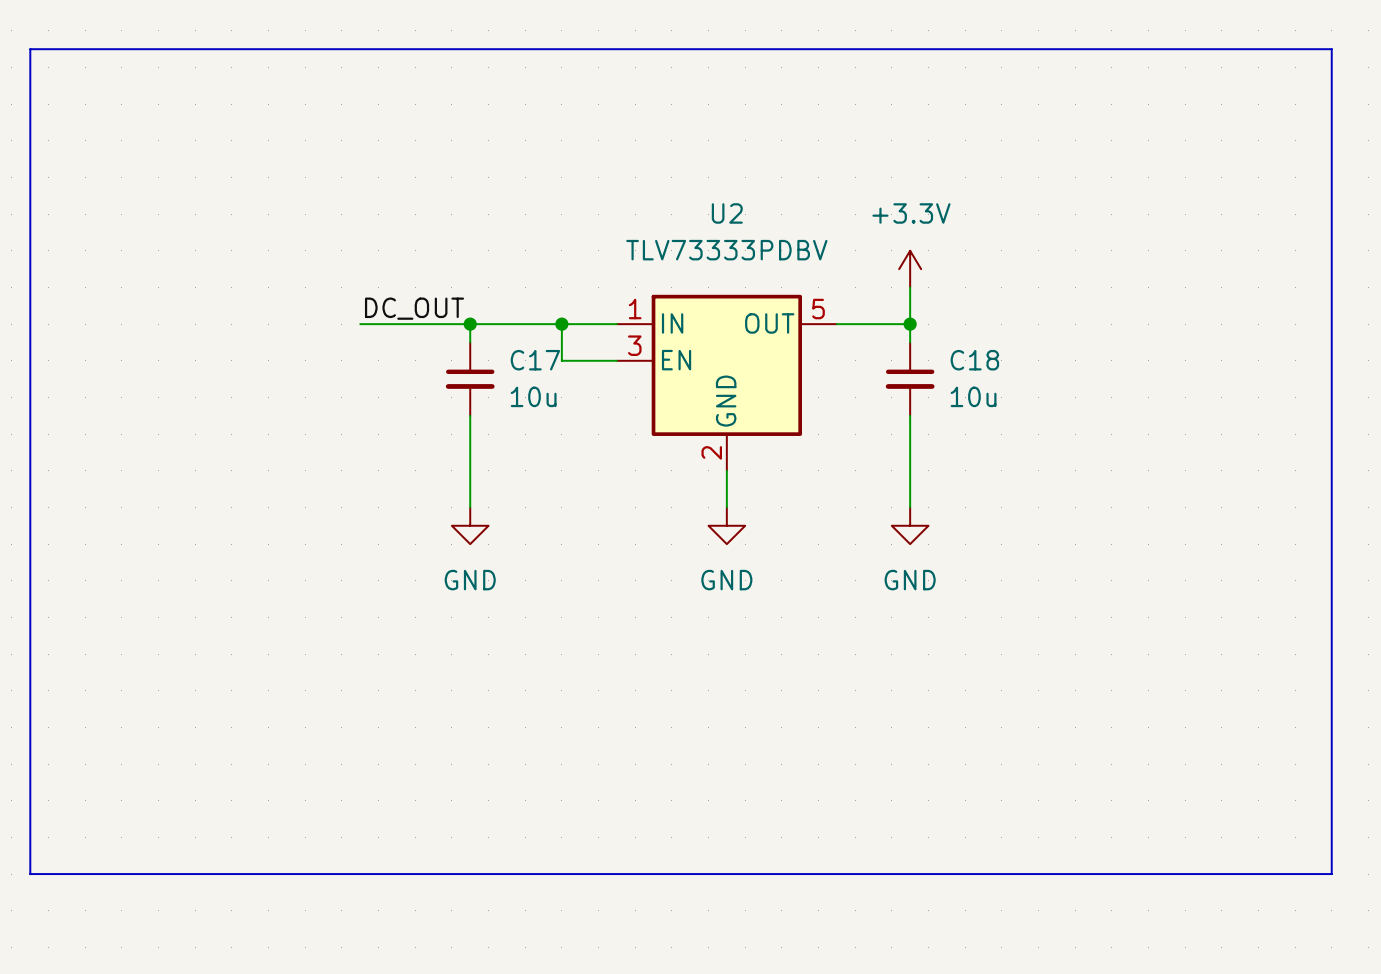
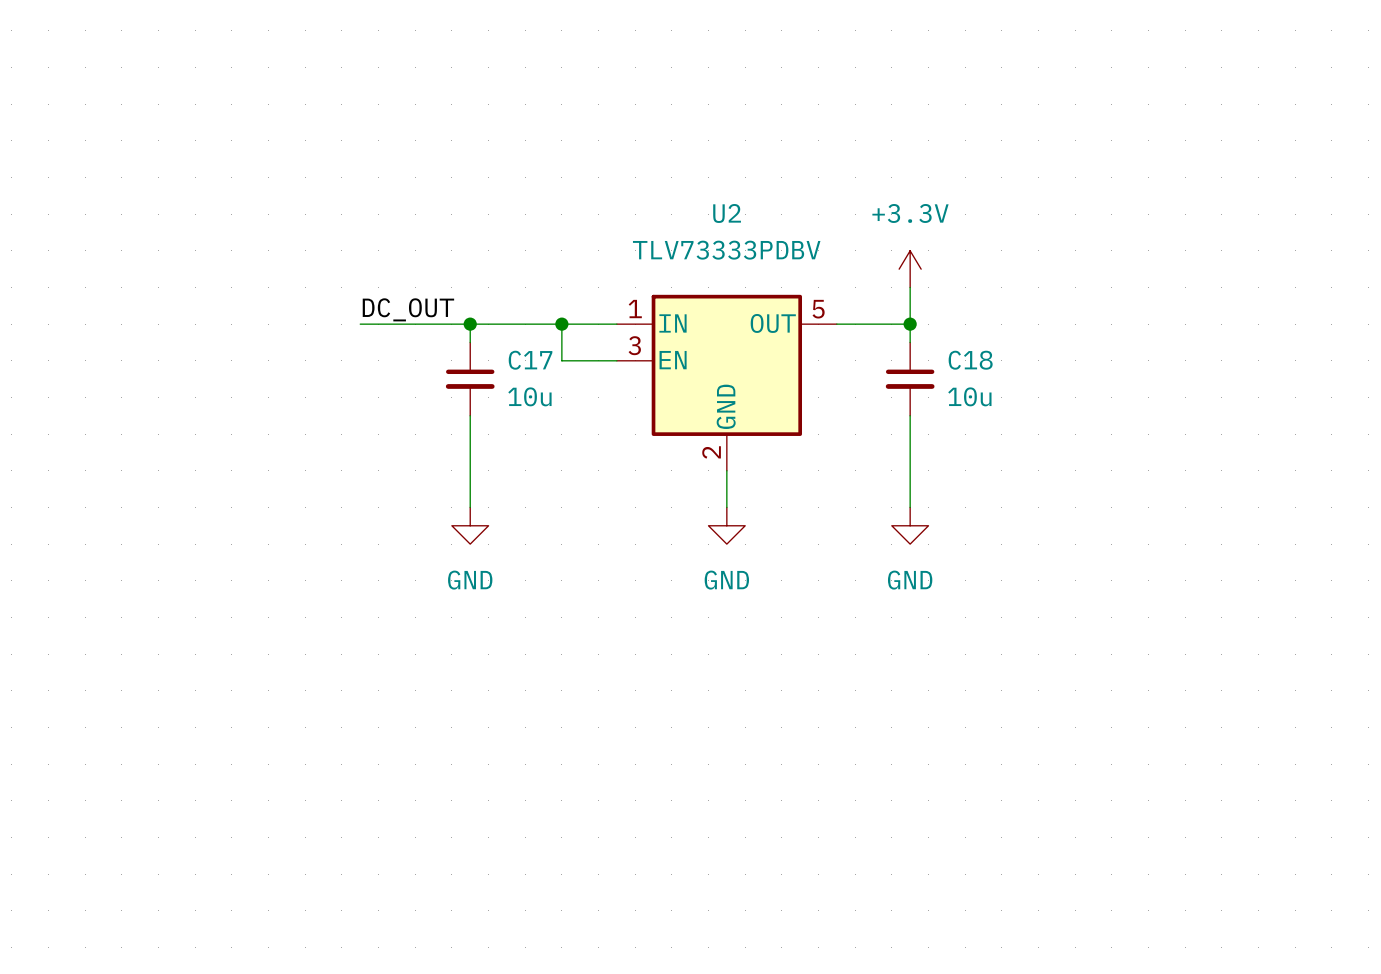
line: (30, 49) (1331, 49) (1331, 874) (30, 874) (30, 49) -> none

